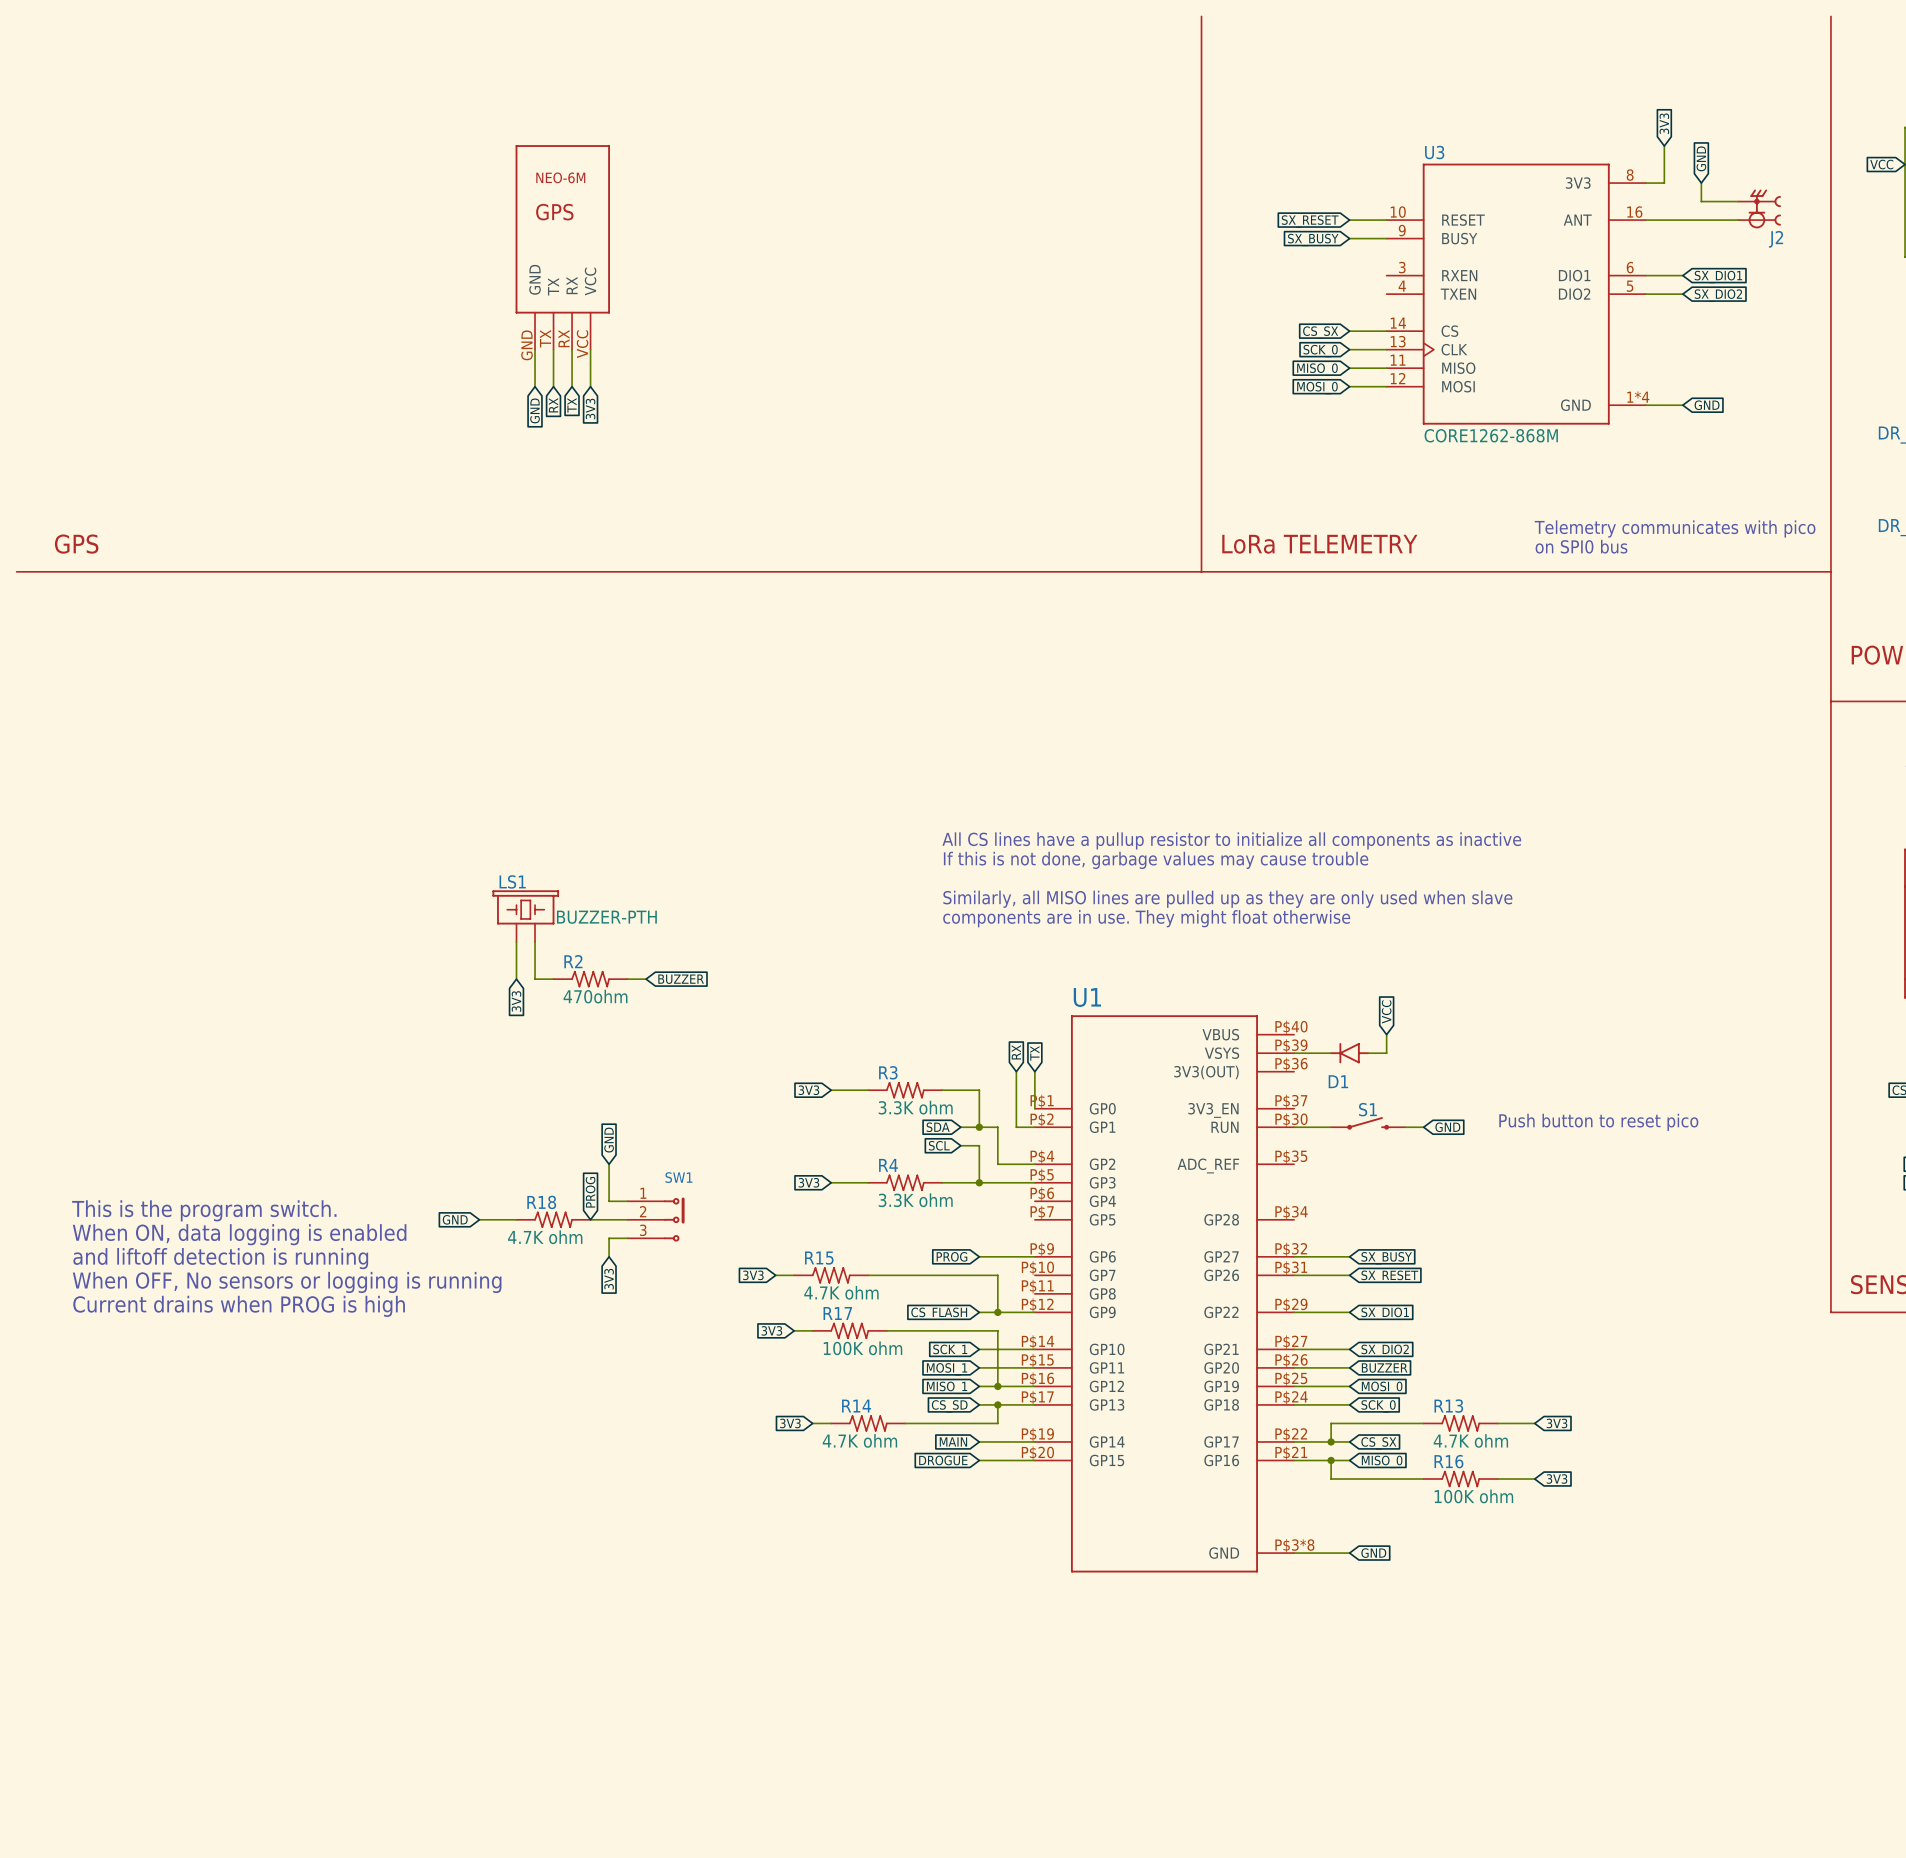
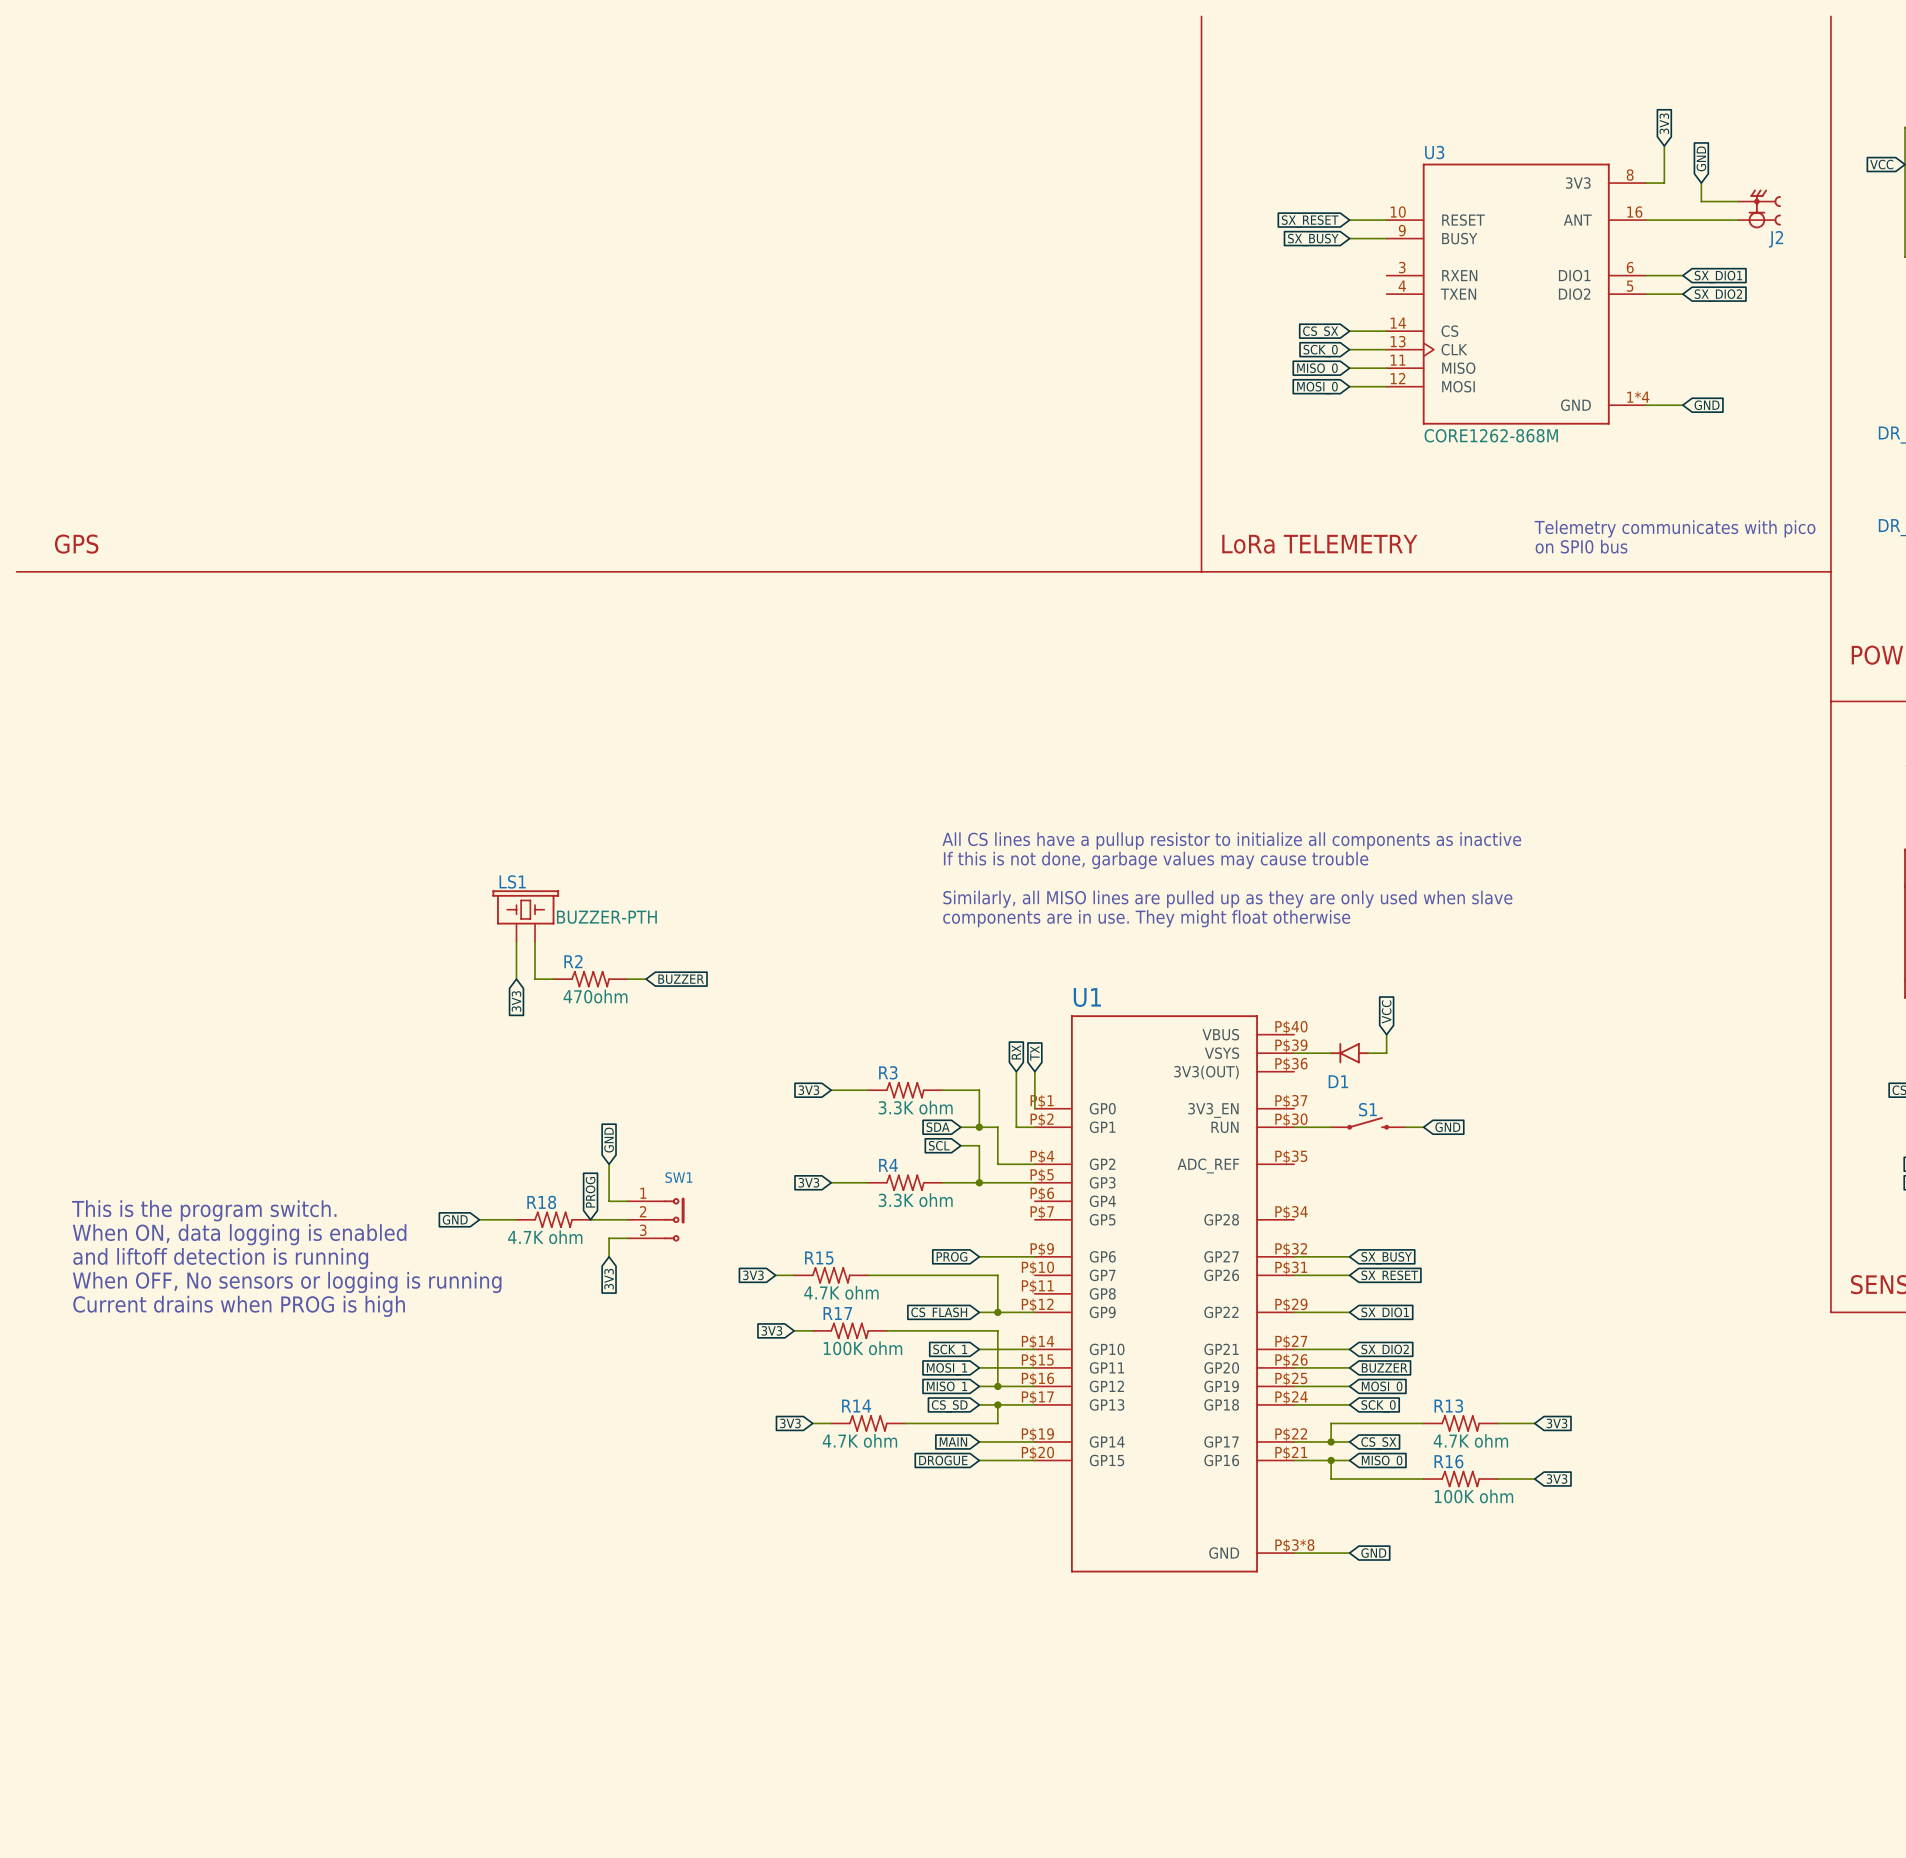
part: (562, 247) -> none
wire: (535, 349) (535, 386) -> none
wire: (553, 349) (553, 386) -> none
wire: (572, 349) (572, 386) -> none
wire: (590, 349) (590, 386) -> none
global label: RX (553, 405) -> none
global label: TX (572, 405) -> none
global label: 3V3 (590, 409) -> none
global label: GND (535, 410) -> none
text: Push button to reset pico (1598, 1122) -> none

